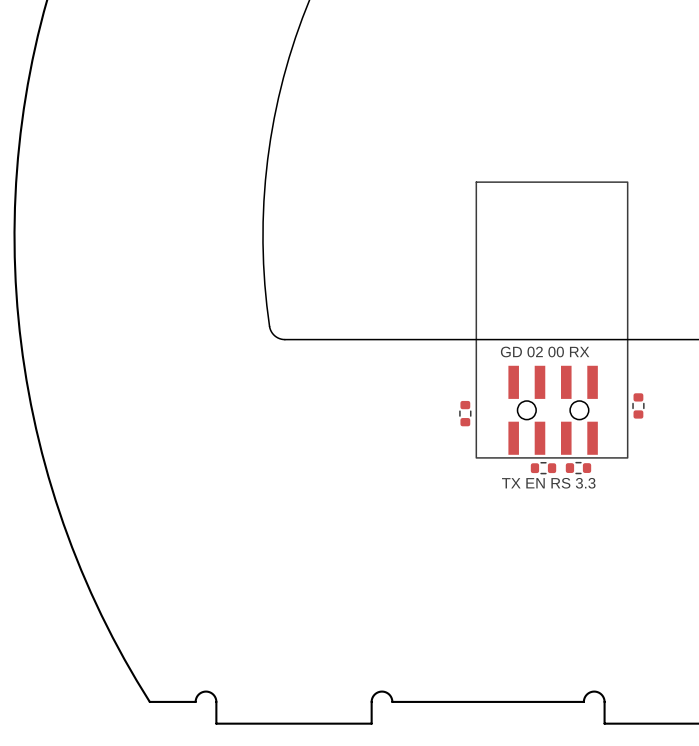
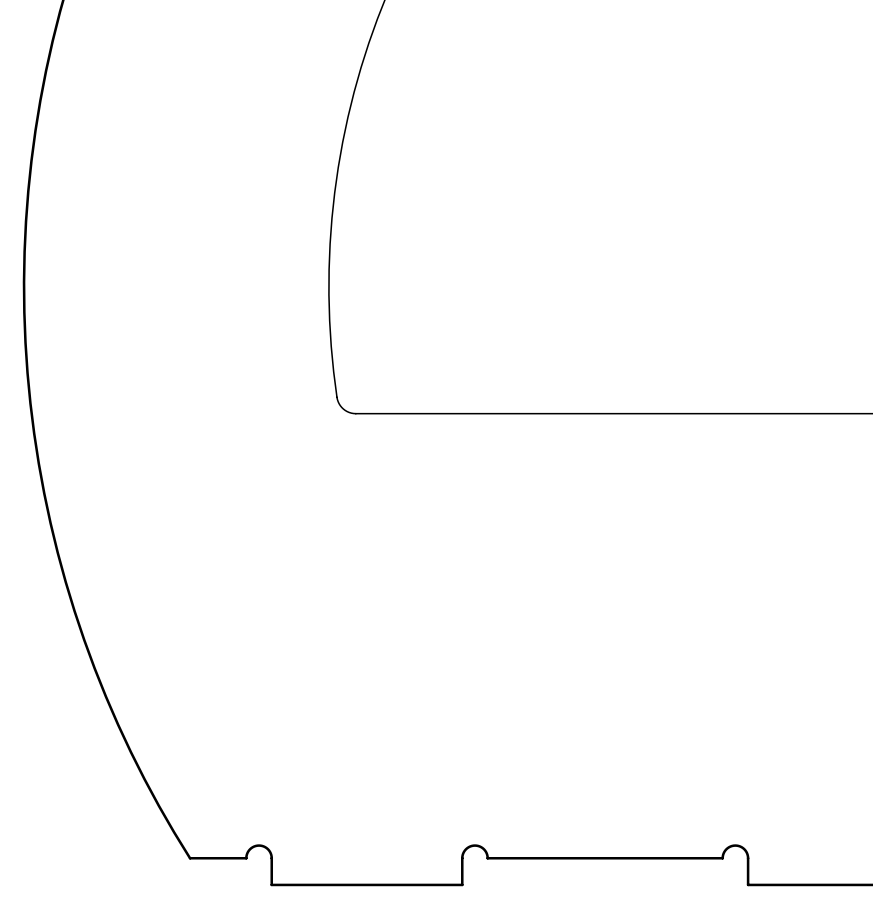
part: (551, 320) -> none
part: (638, 405) -> none
part: (465, 413) -> none
part: (543, 468) -> none
part: (578, 468) -> none

